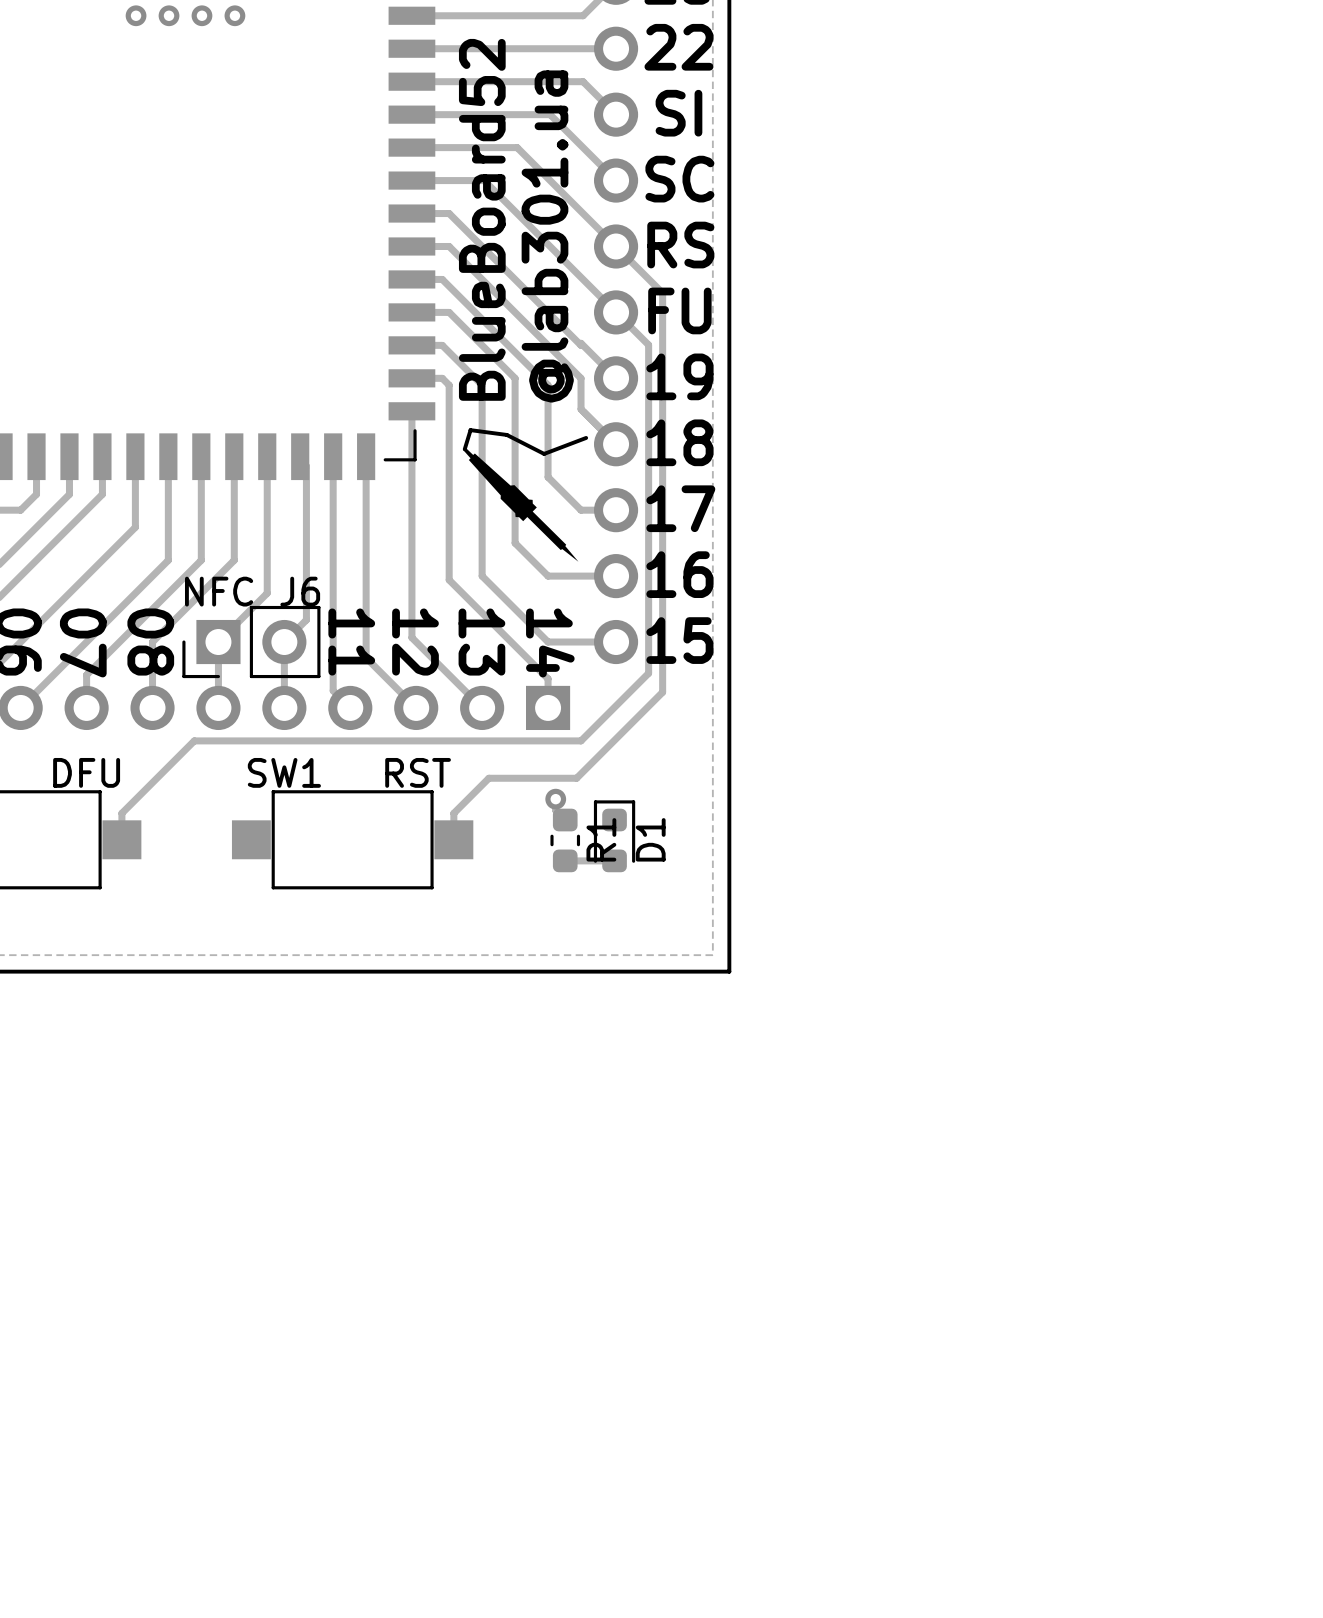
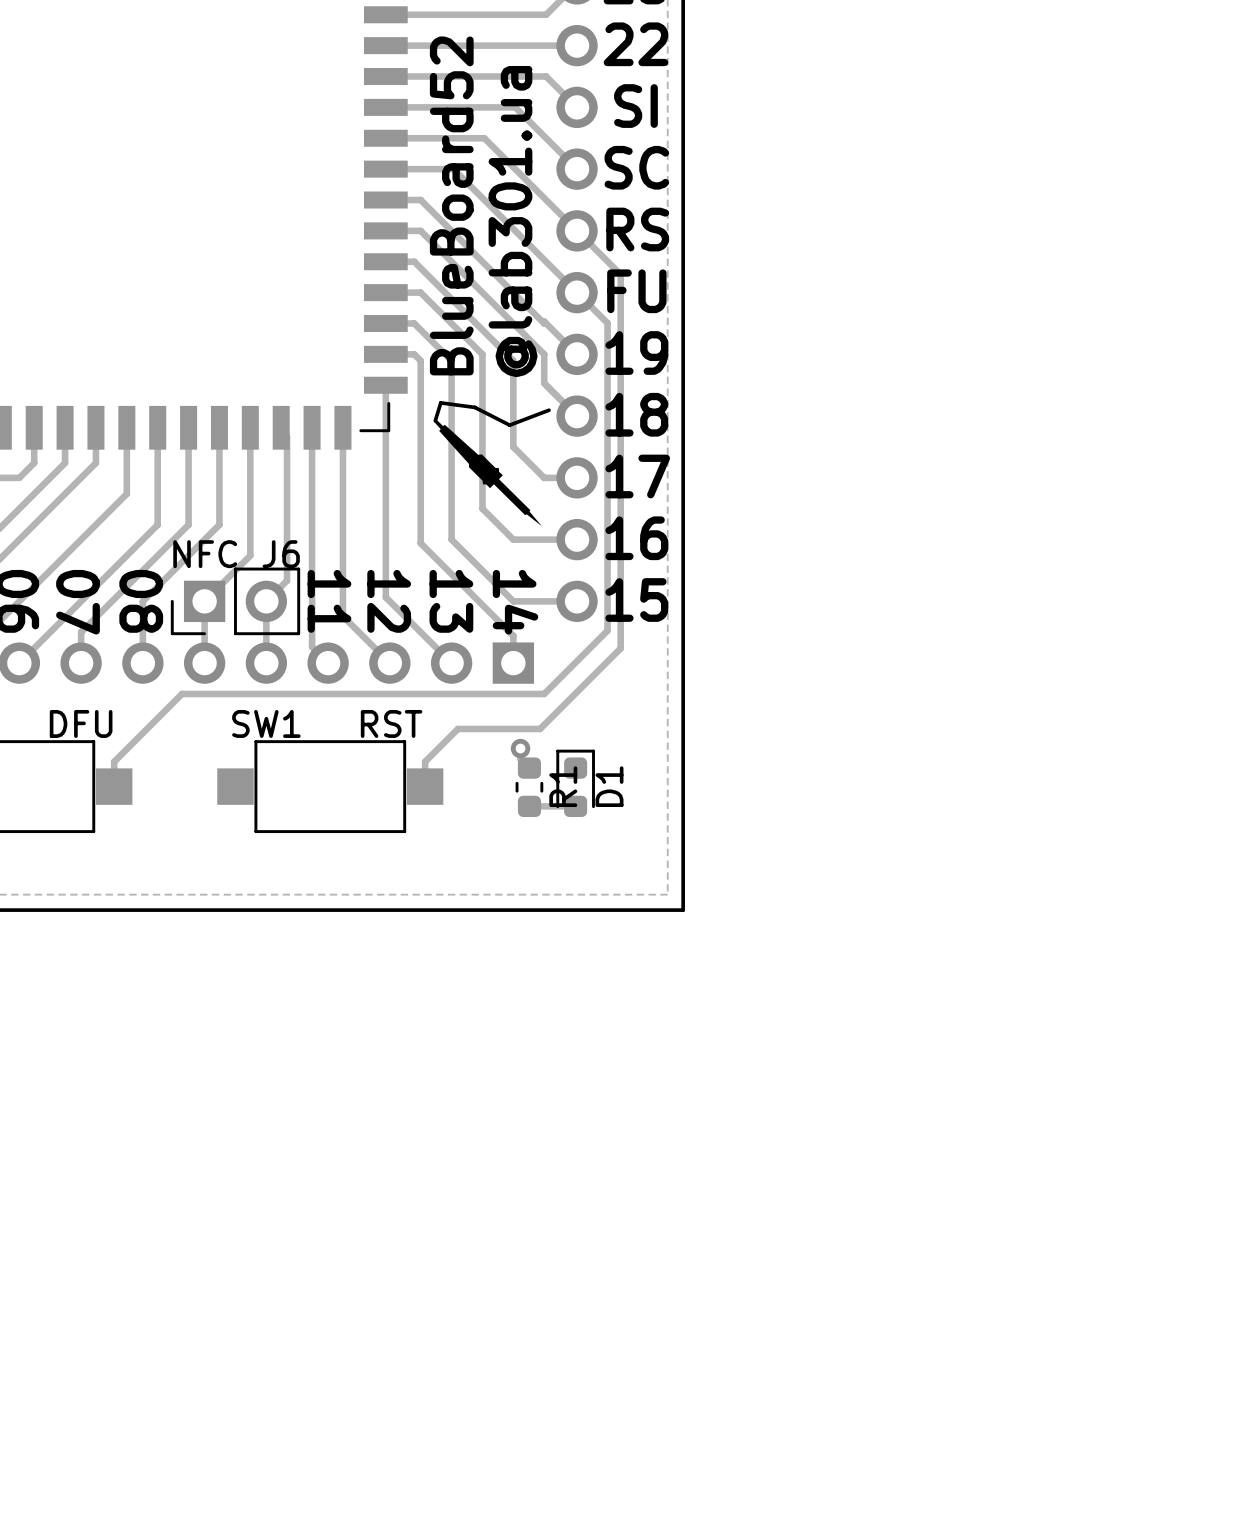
via: (136, 15) -> none
via: (169, 15) -> none
via: (201, 15) -> none
via: (234, 15) -> none

